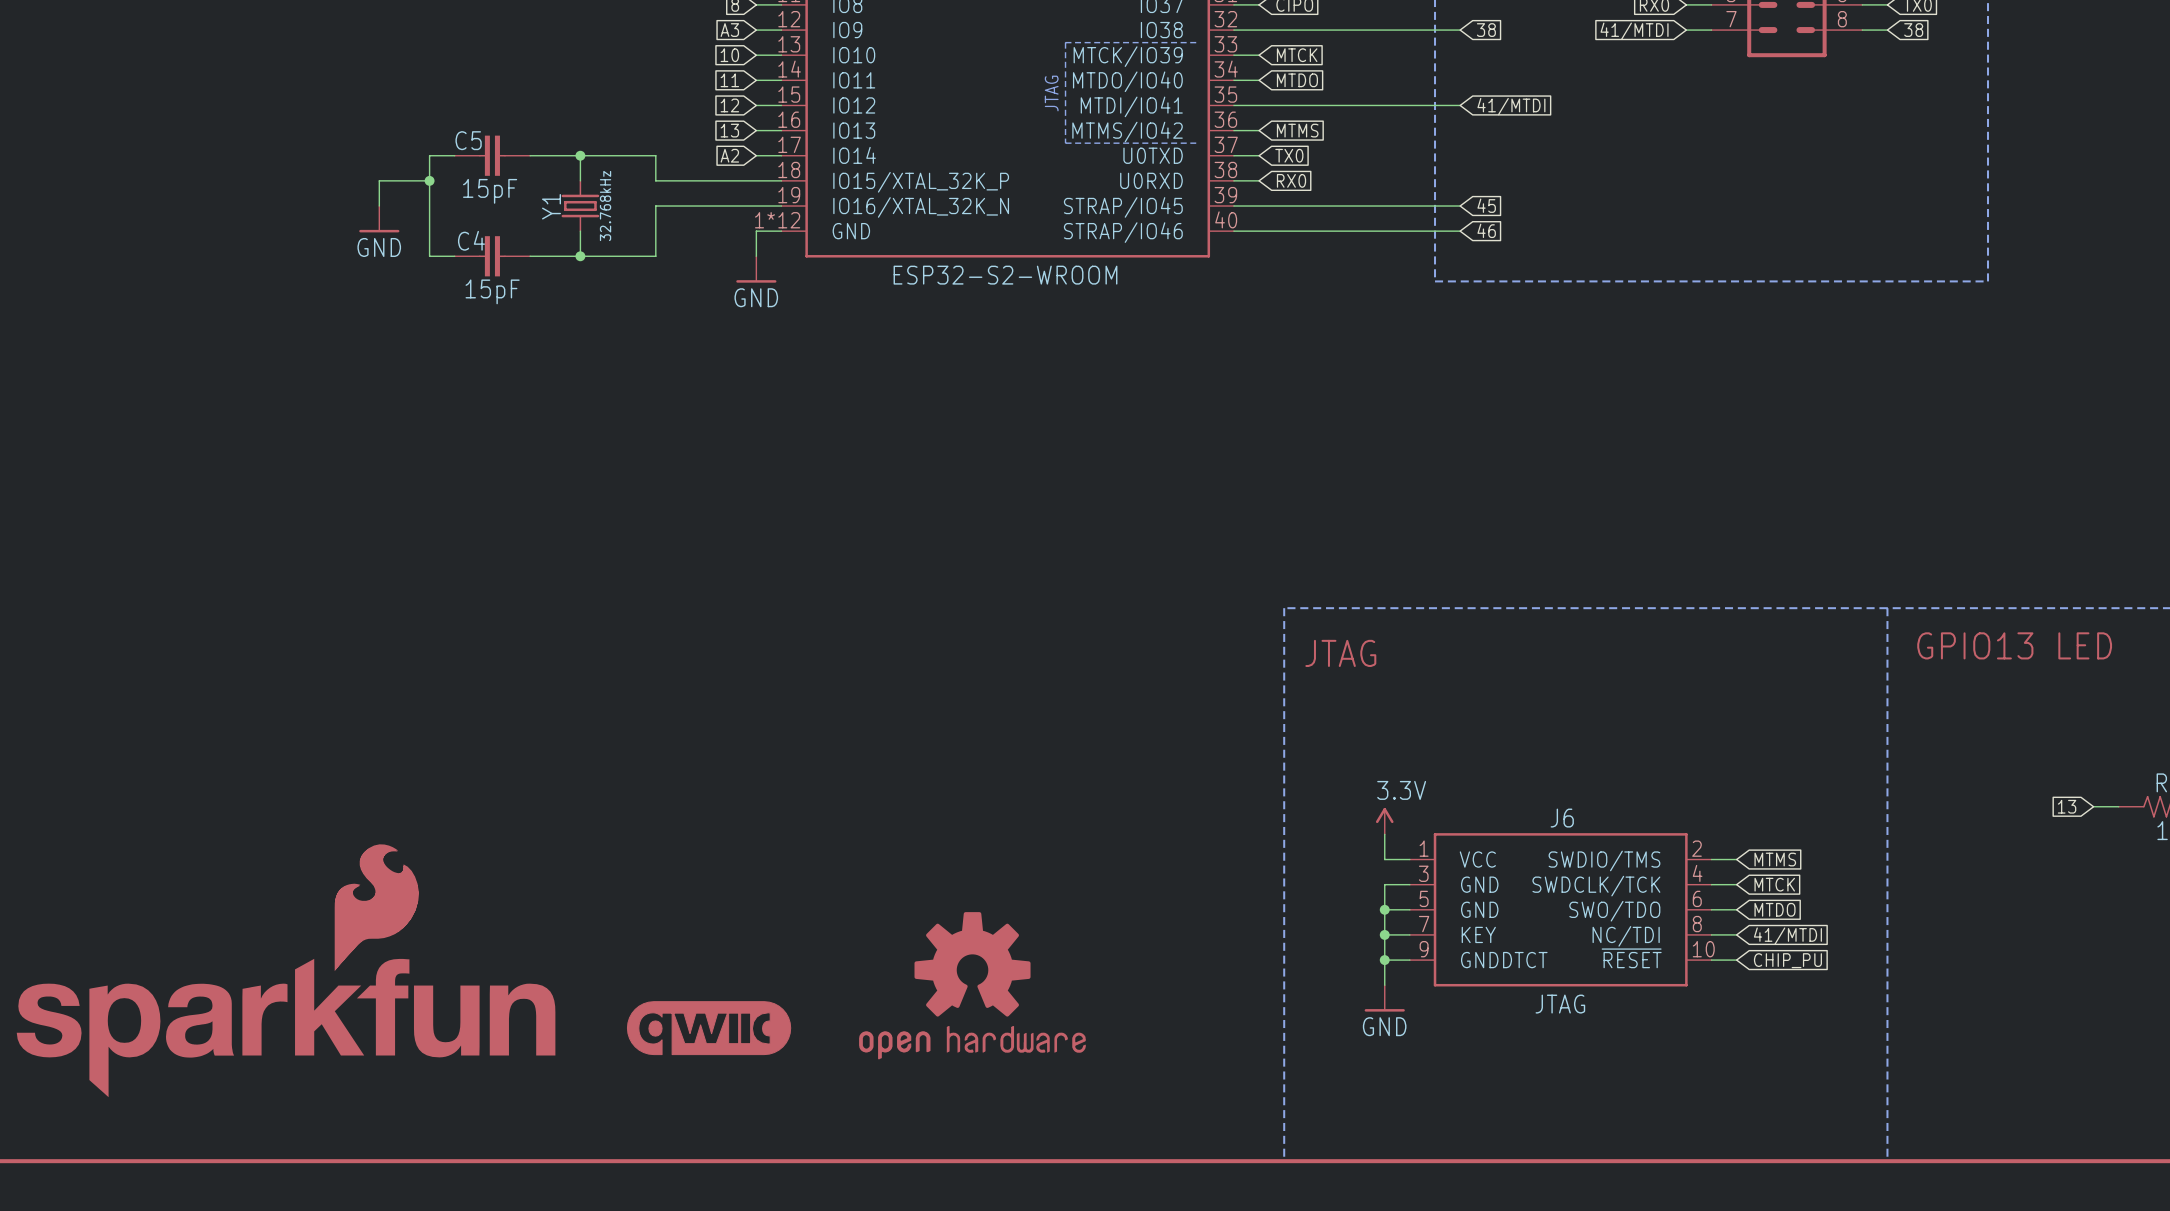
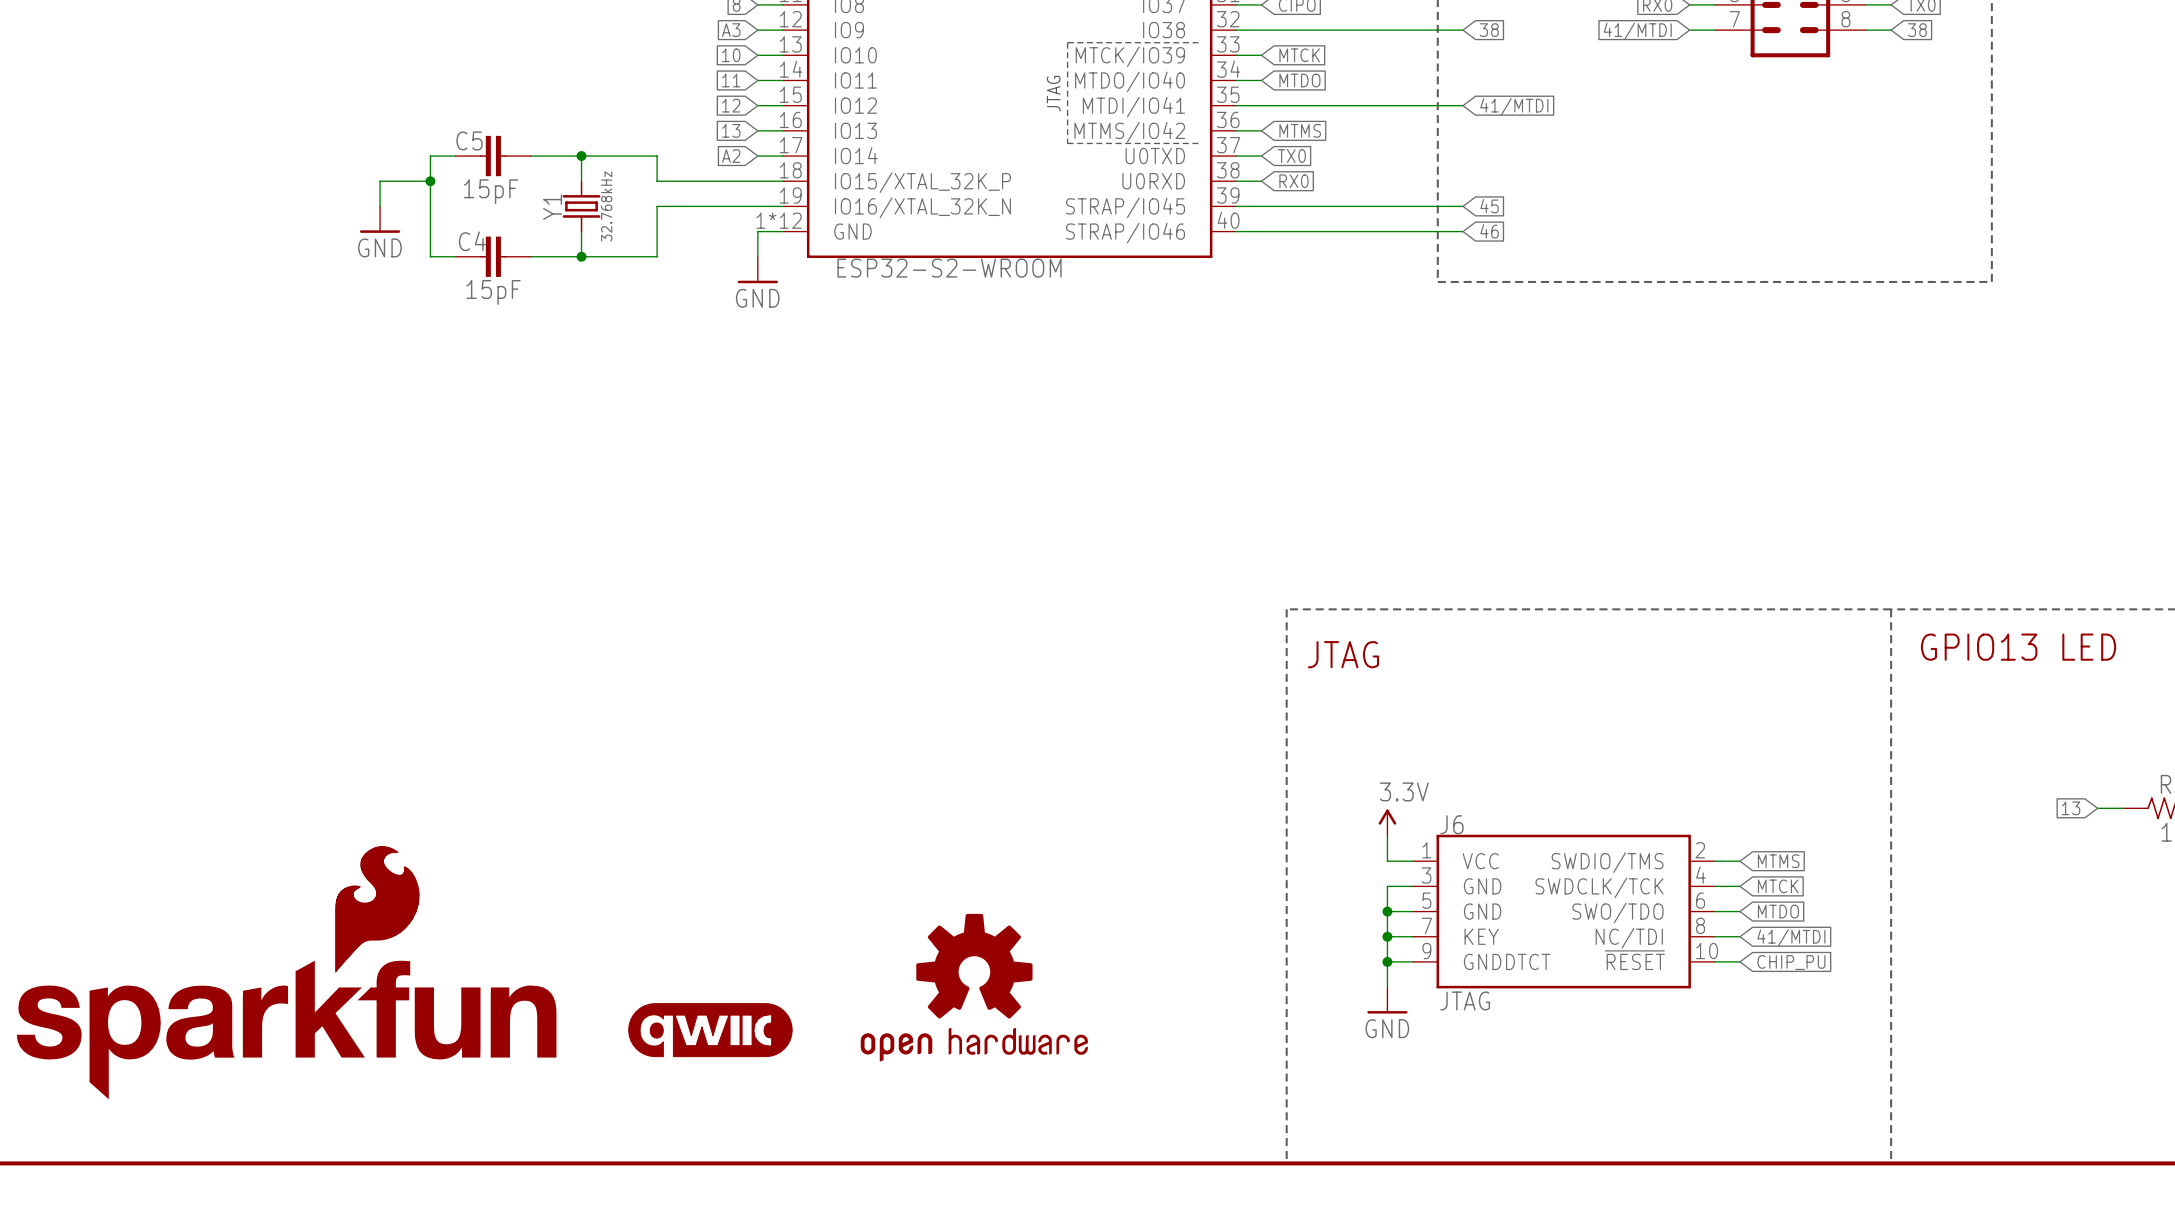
part value position: ESP32-S2-WROOM (1005, 275) -> ESP32-S2-WROOM (949, 268)
J6 name position: J6 (1562, 818) -> J6 (1451, 824)
J6 value position: JTAG (1560, 1004) -> JTAG (1465, 1000)

